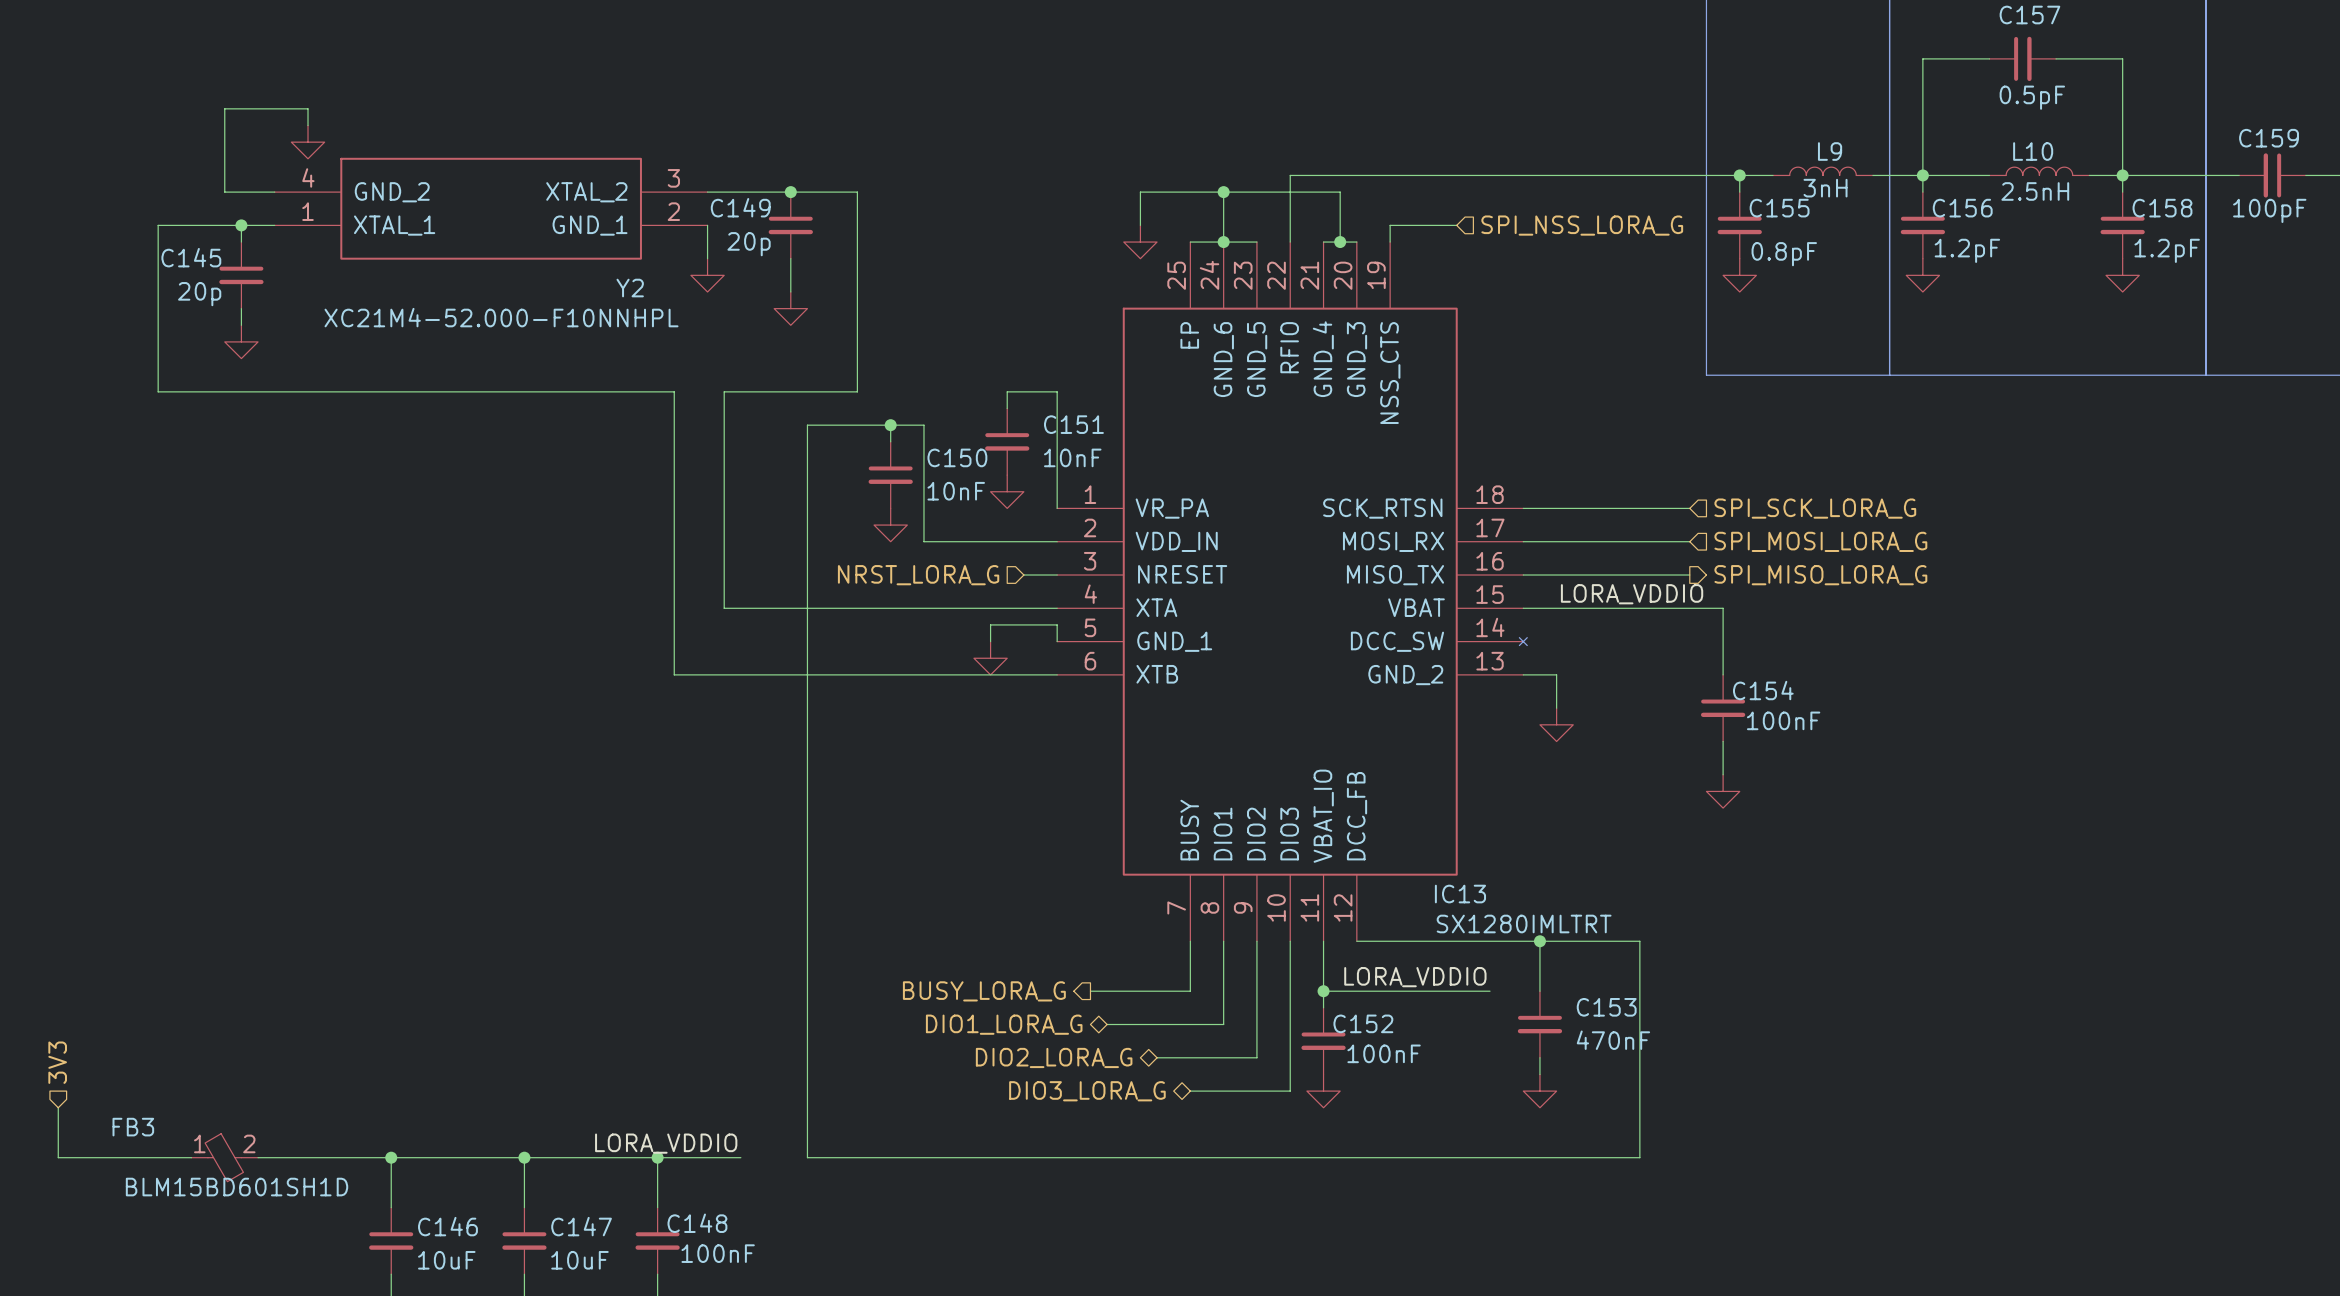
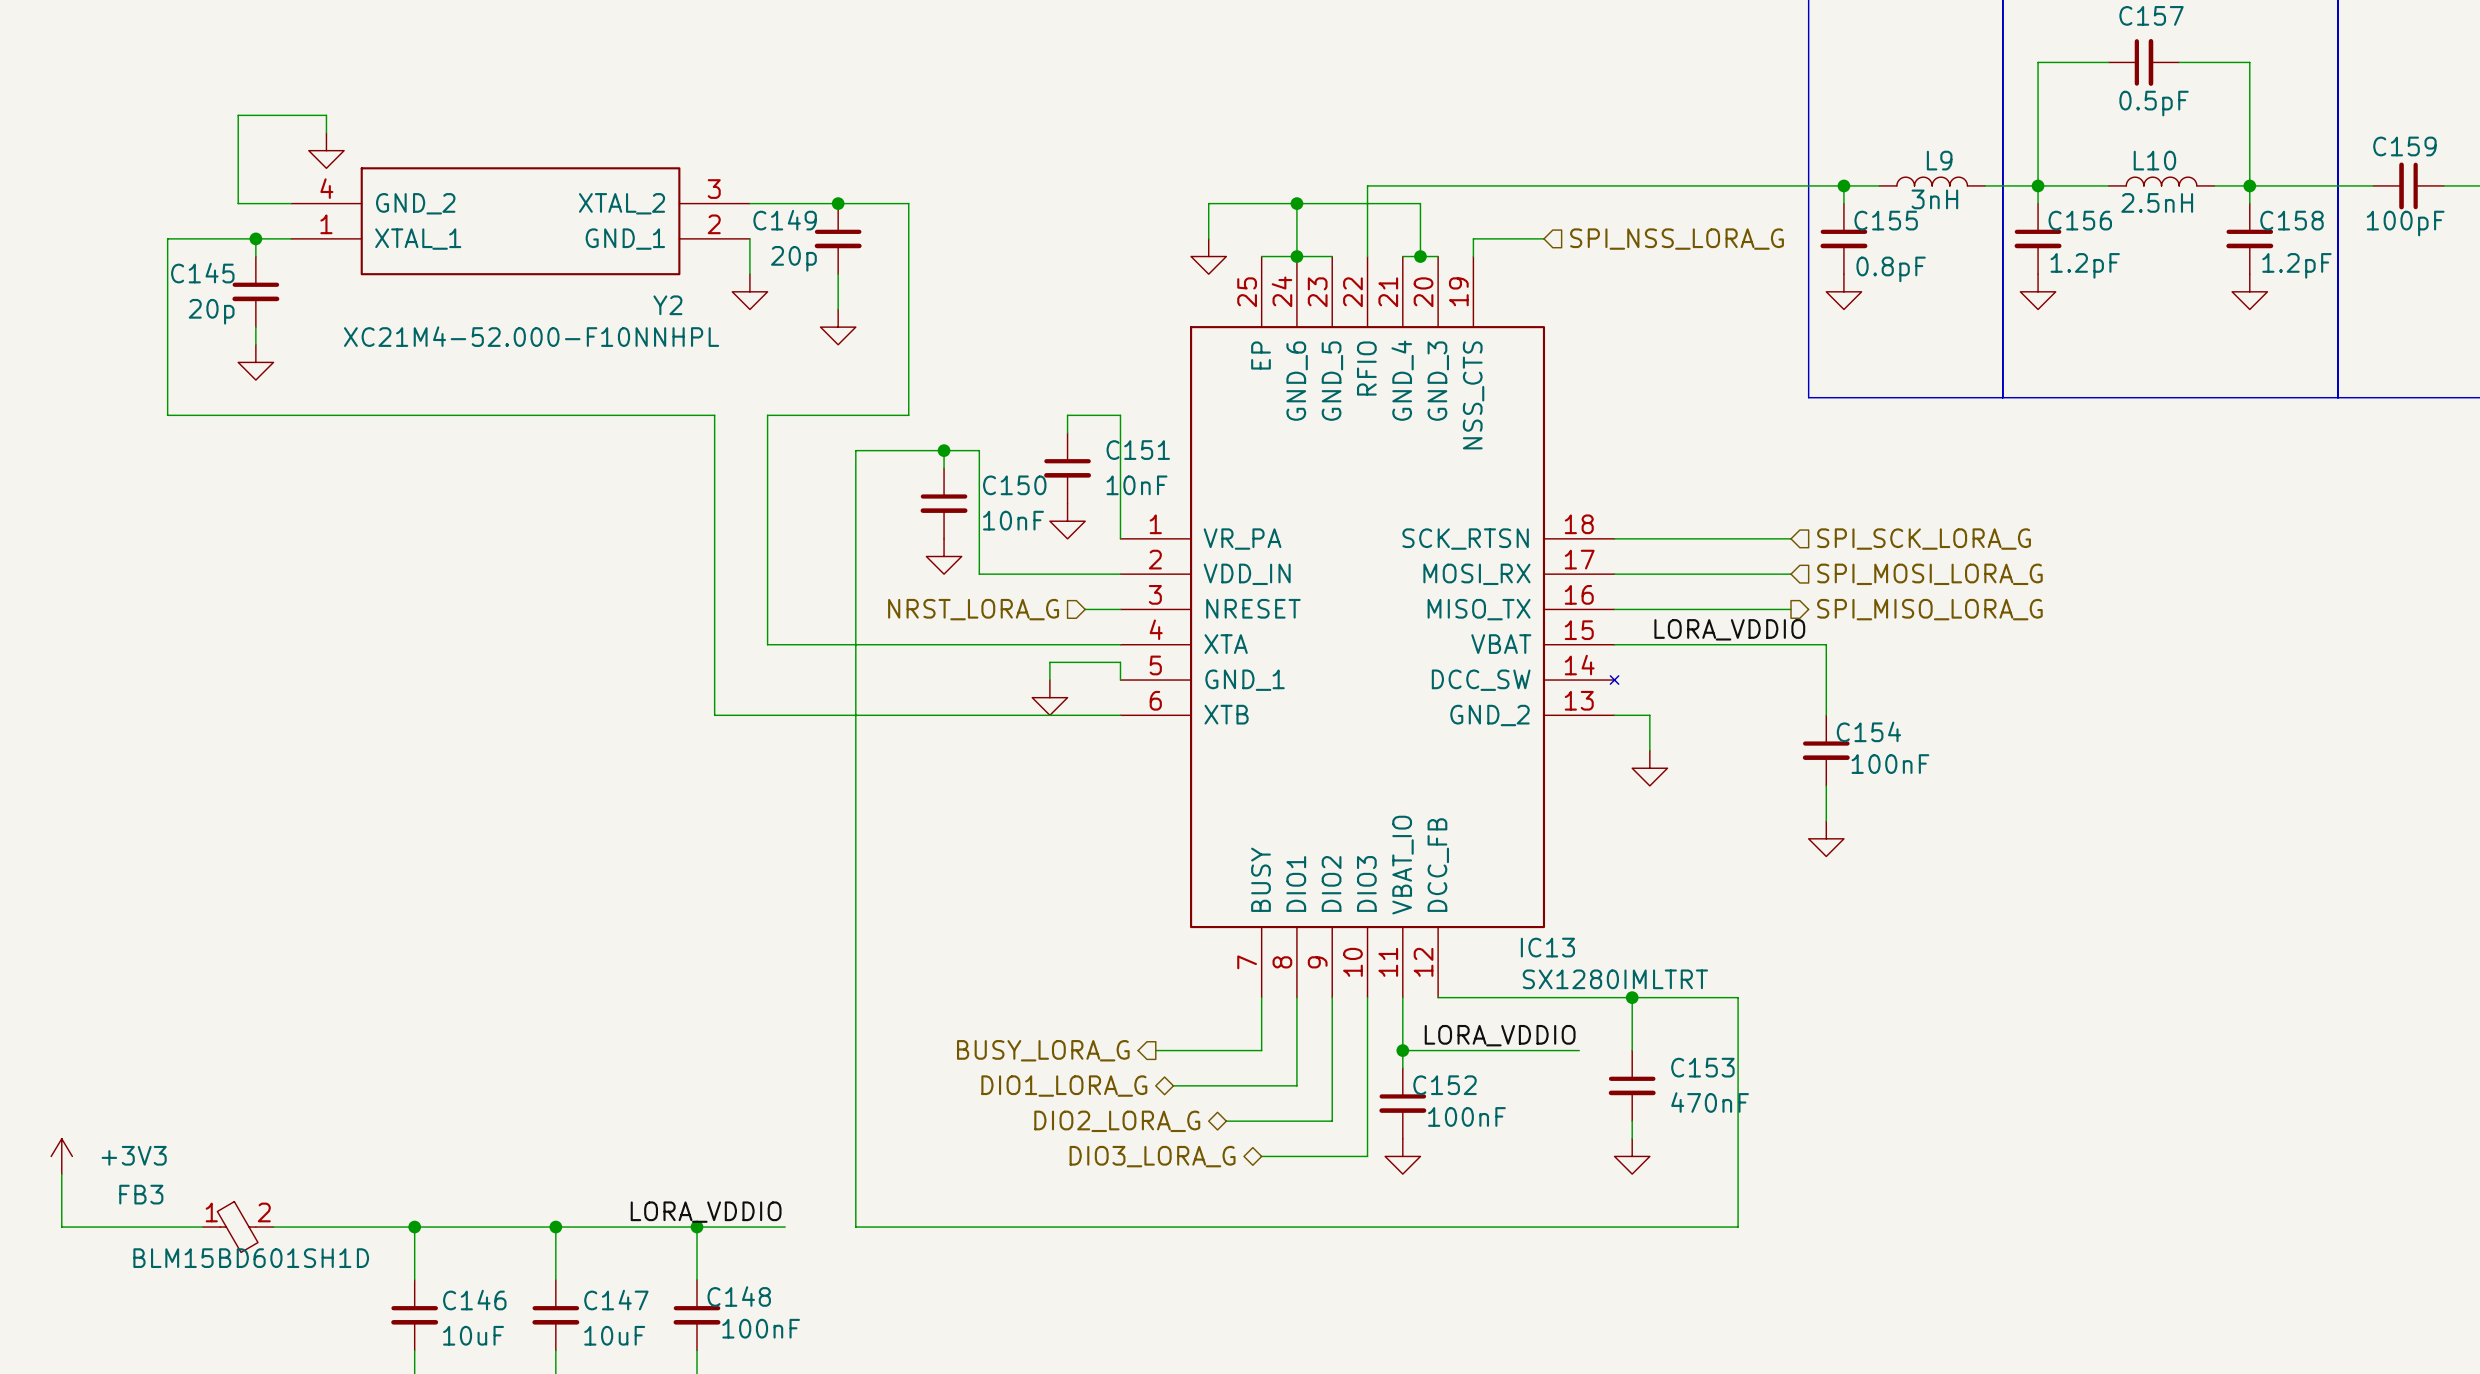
hierarchical label: 3V3 (57, 1062) -> none
power symbol: none -> +3V3 (61, 1156)

